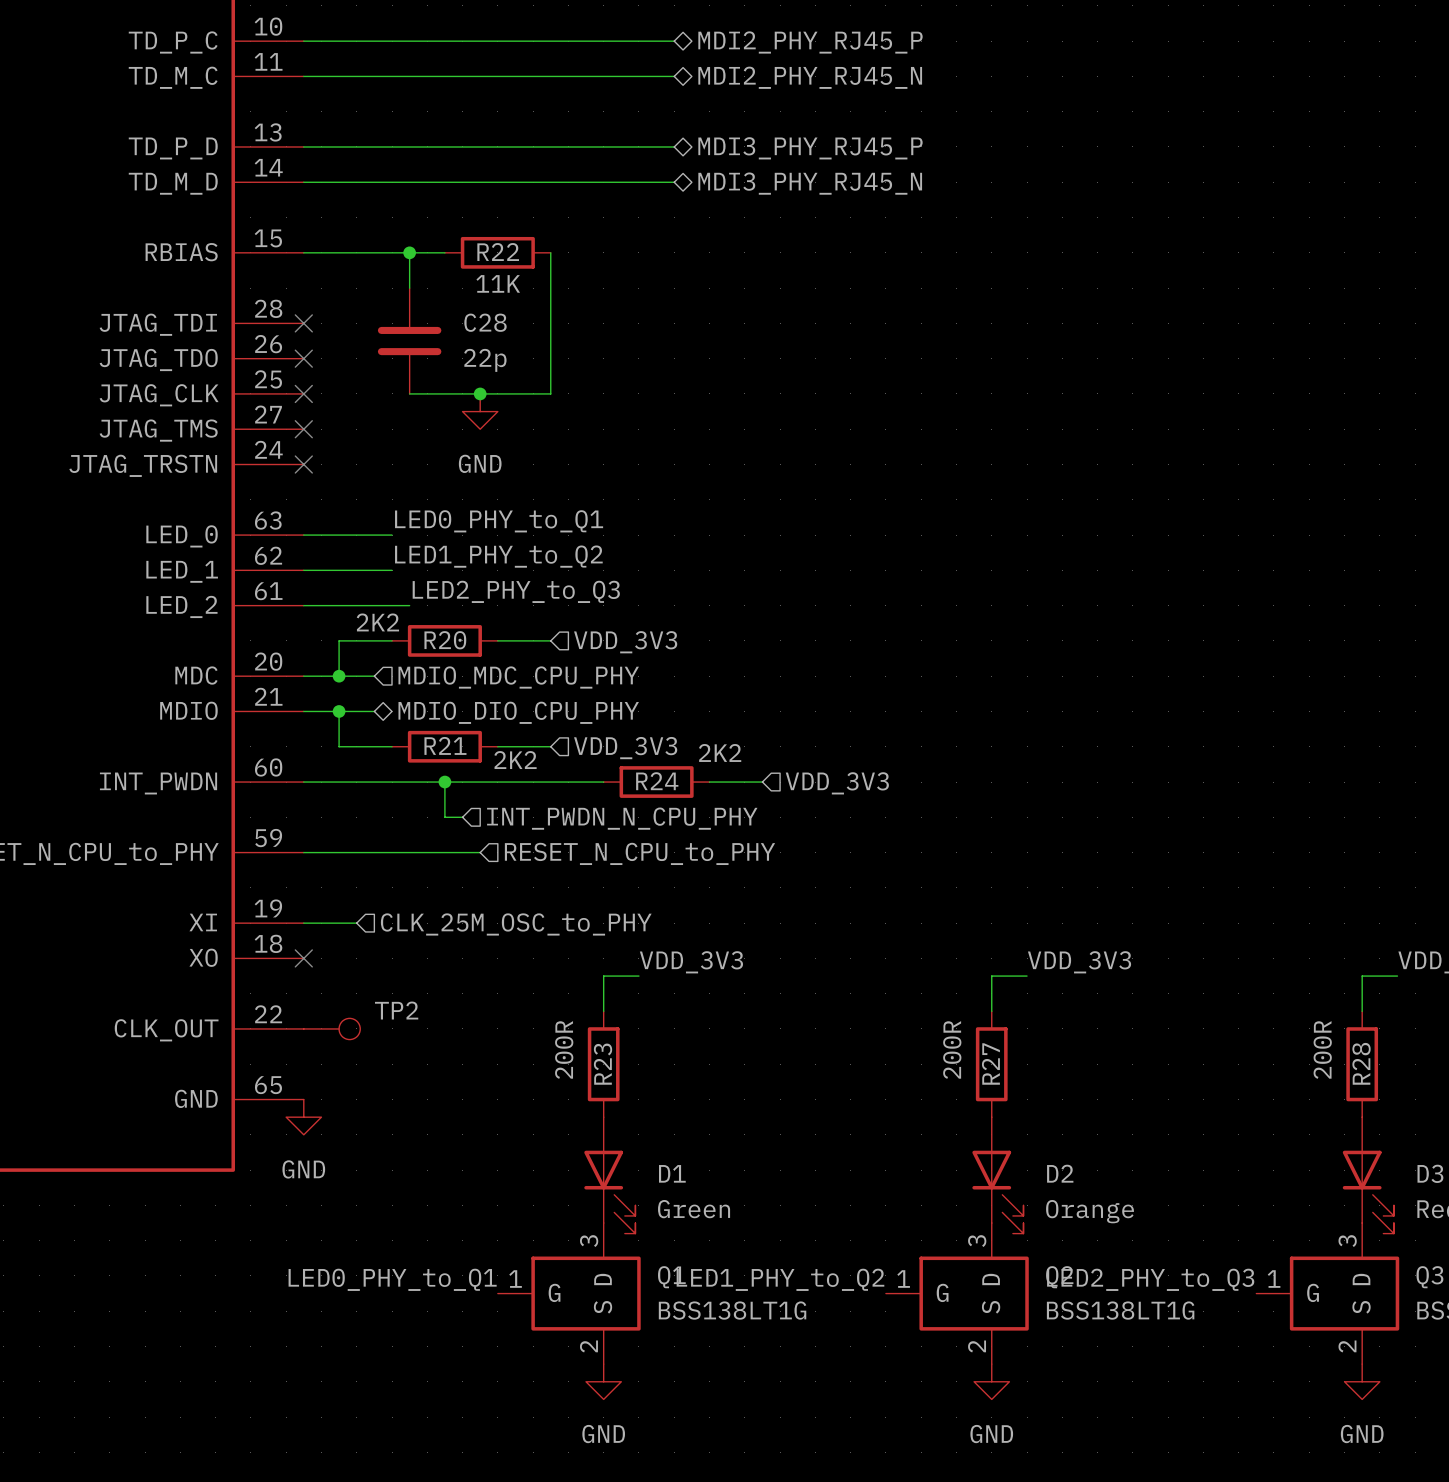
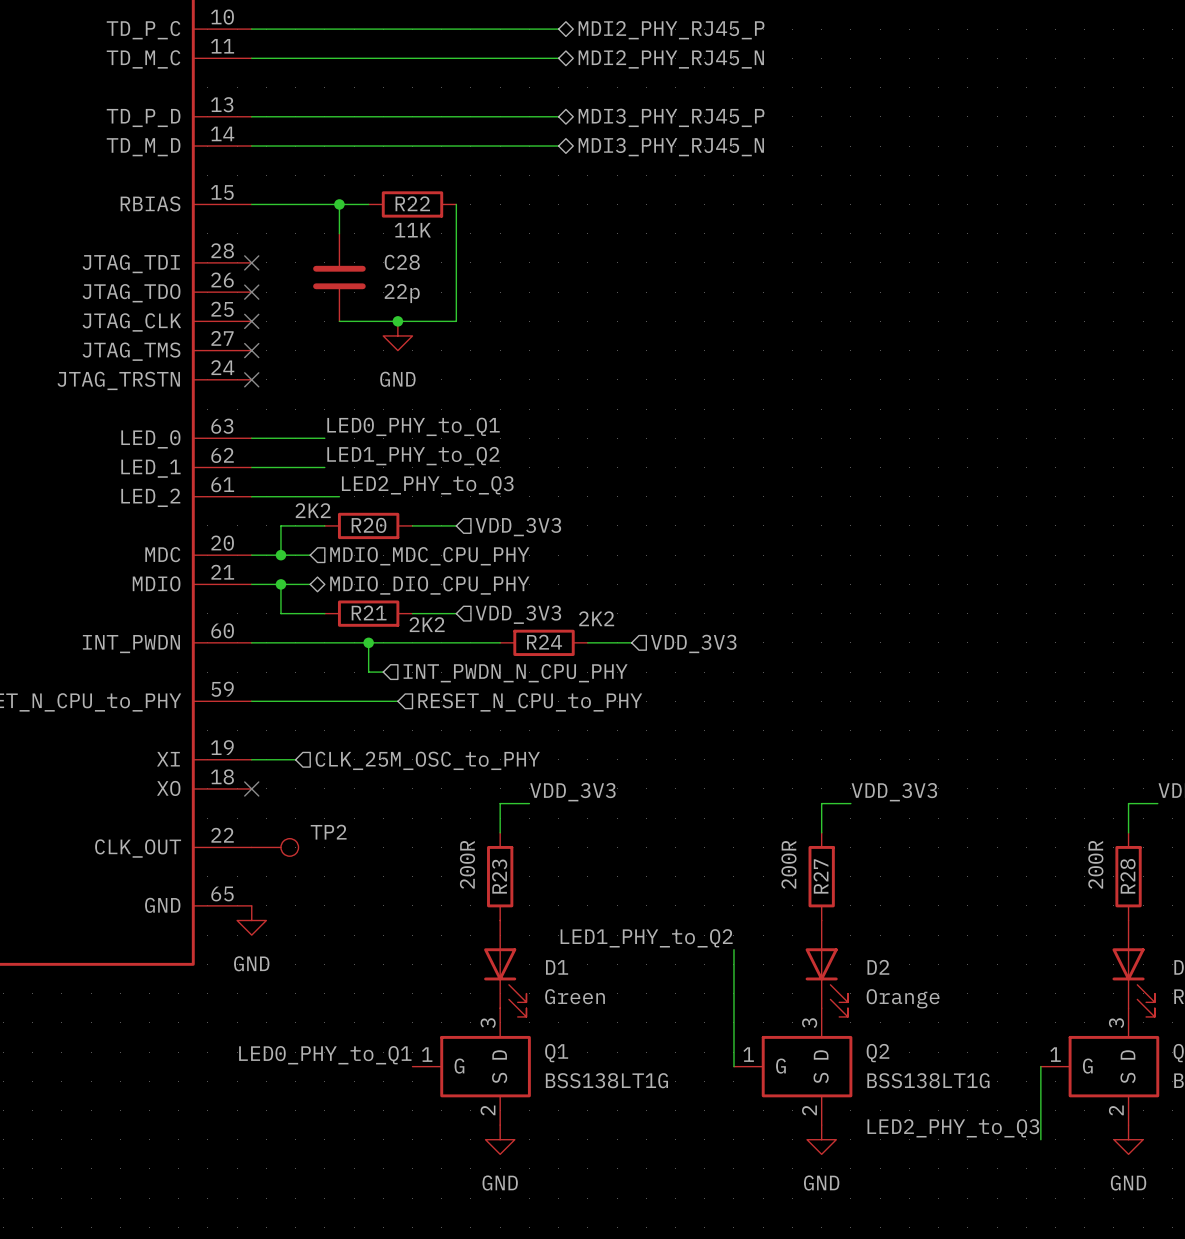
wire: none -> (733, 949) (733, 1066)
label position: LED1_PHY_to_Q2 (780, 1279) -> LED1_PHY_to_Q2 (646, 938)
label position: LED2_PHY_to_Q3 (1150, 1279) -> LED2_PHY_to_Q3 (953, 1128)
wire: none -> (1040, 1066) (1040, 1139)

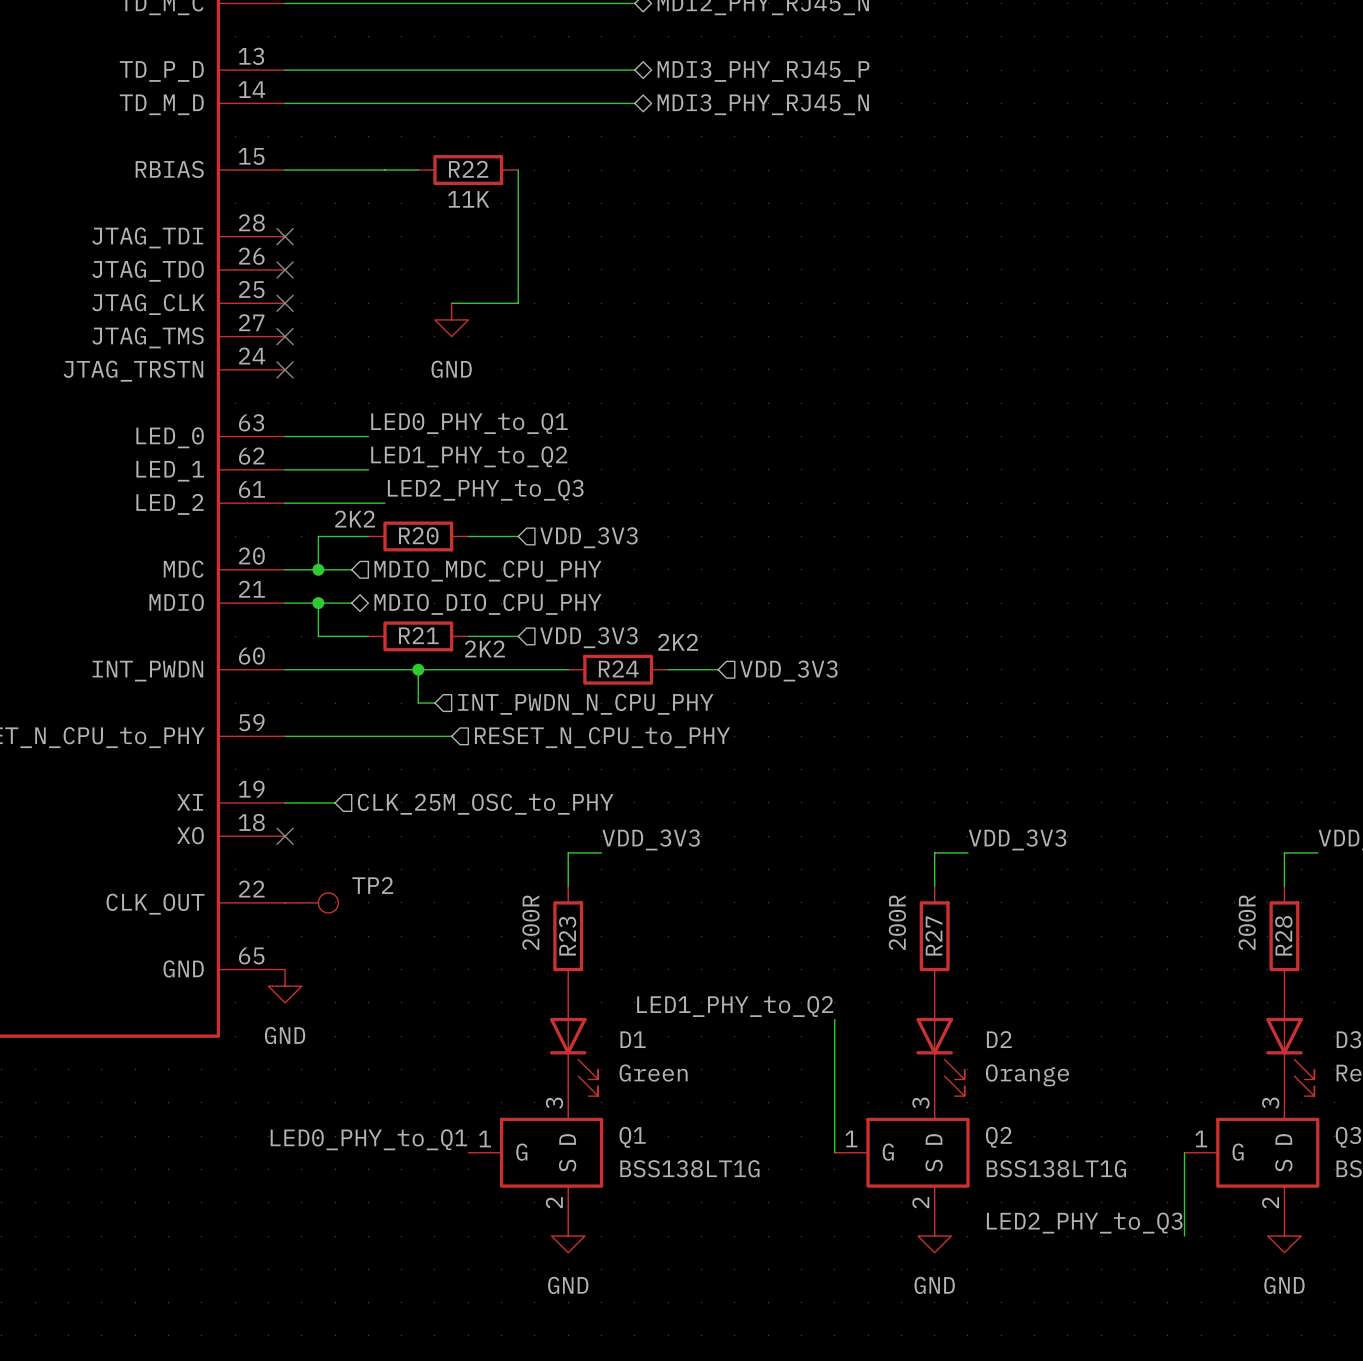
wire: (339, 204) (339, 233) -> none
junction: (339, 204) -> none
C28: 22p (339, 277) -> none
wire: (339, 321) (397, 321) -> none
junction: (397, 321) -> none

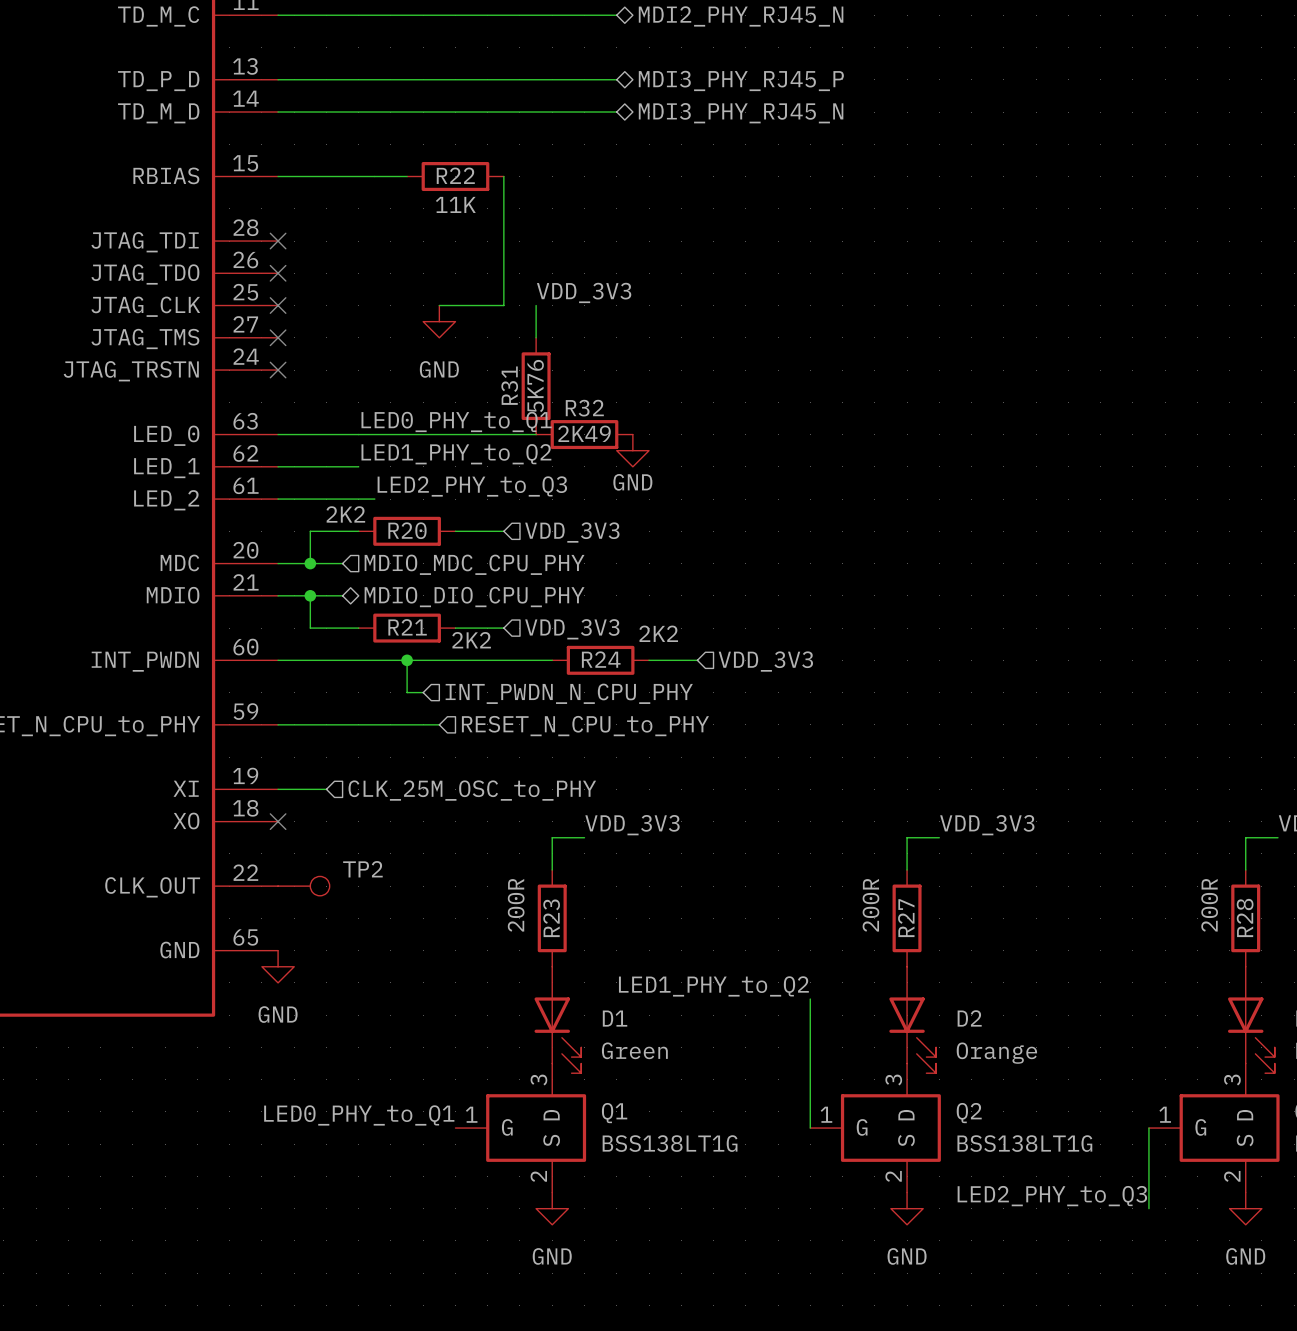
label: none -> VDD_3V3 (584, 292)
wire: none -> (536, 305) (536, 337)
R31: none -> 5K76 (536, 386)
wire: none -> (358, 434) (536, 434)
R32: none -> 2K49 (584, 434)
power symbol: none -> GND (632, 450)

